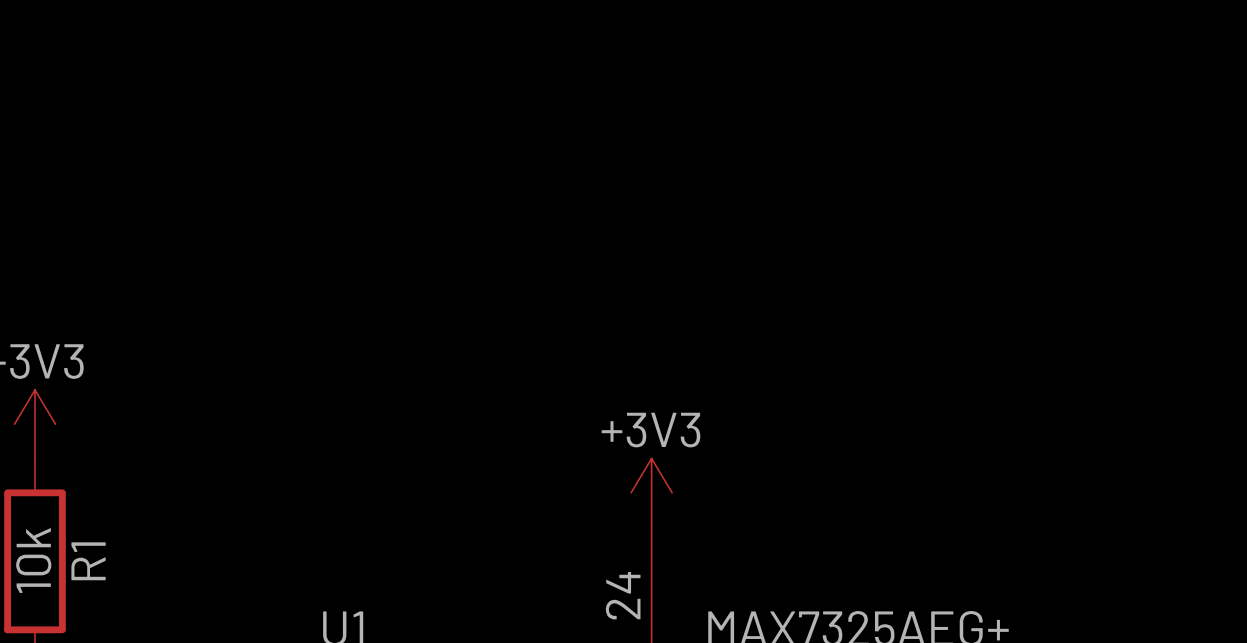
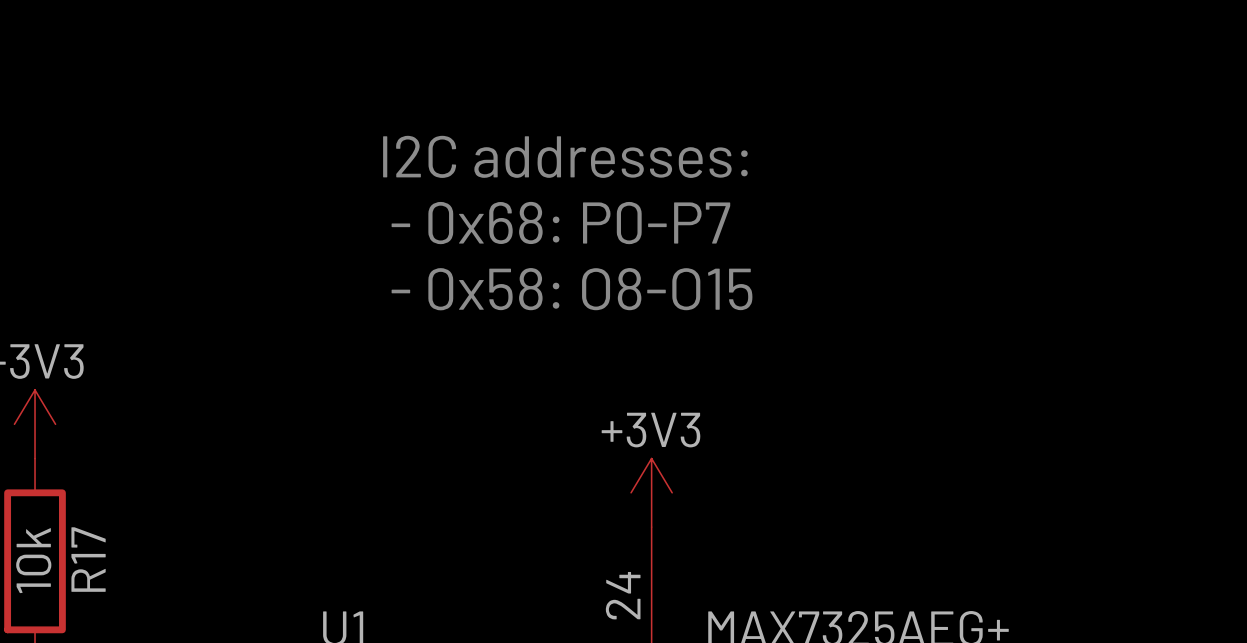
text: none -> I2C addresses: (565, 156)
text: none -> - 0x68: P0-P7 (560, 223)
text: none -> - 0x58: O8-O15 (572, 289)
R1 name: R1 (88, 561) -> R17 (88, 559)

